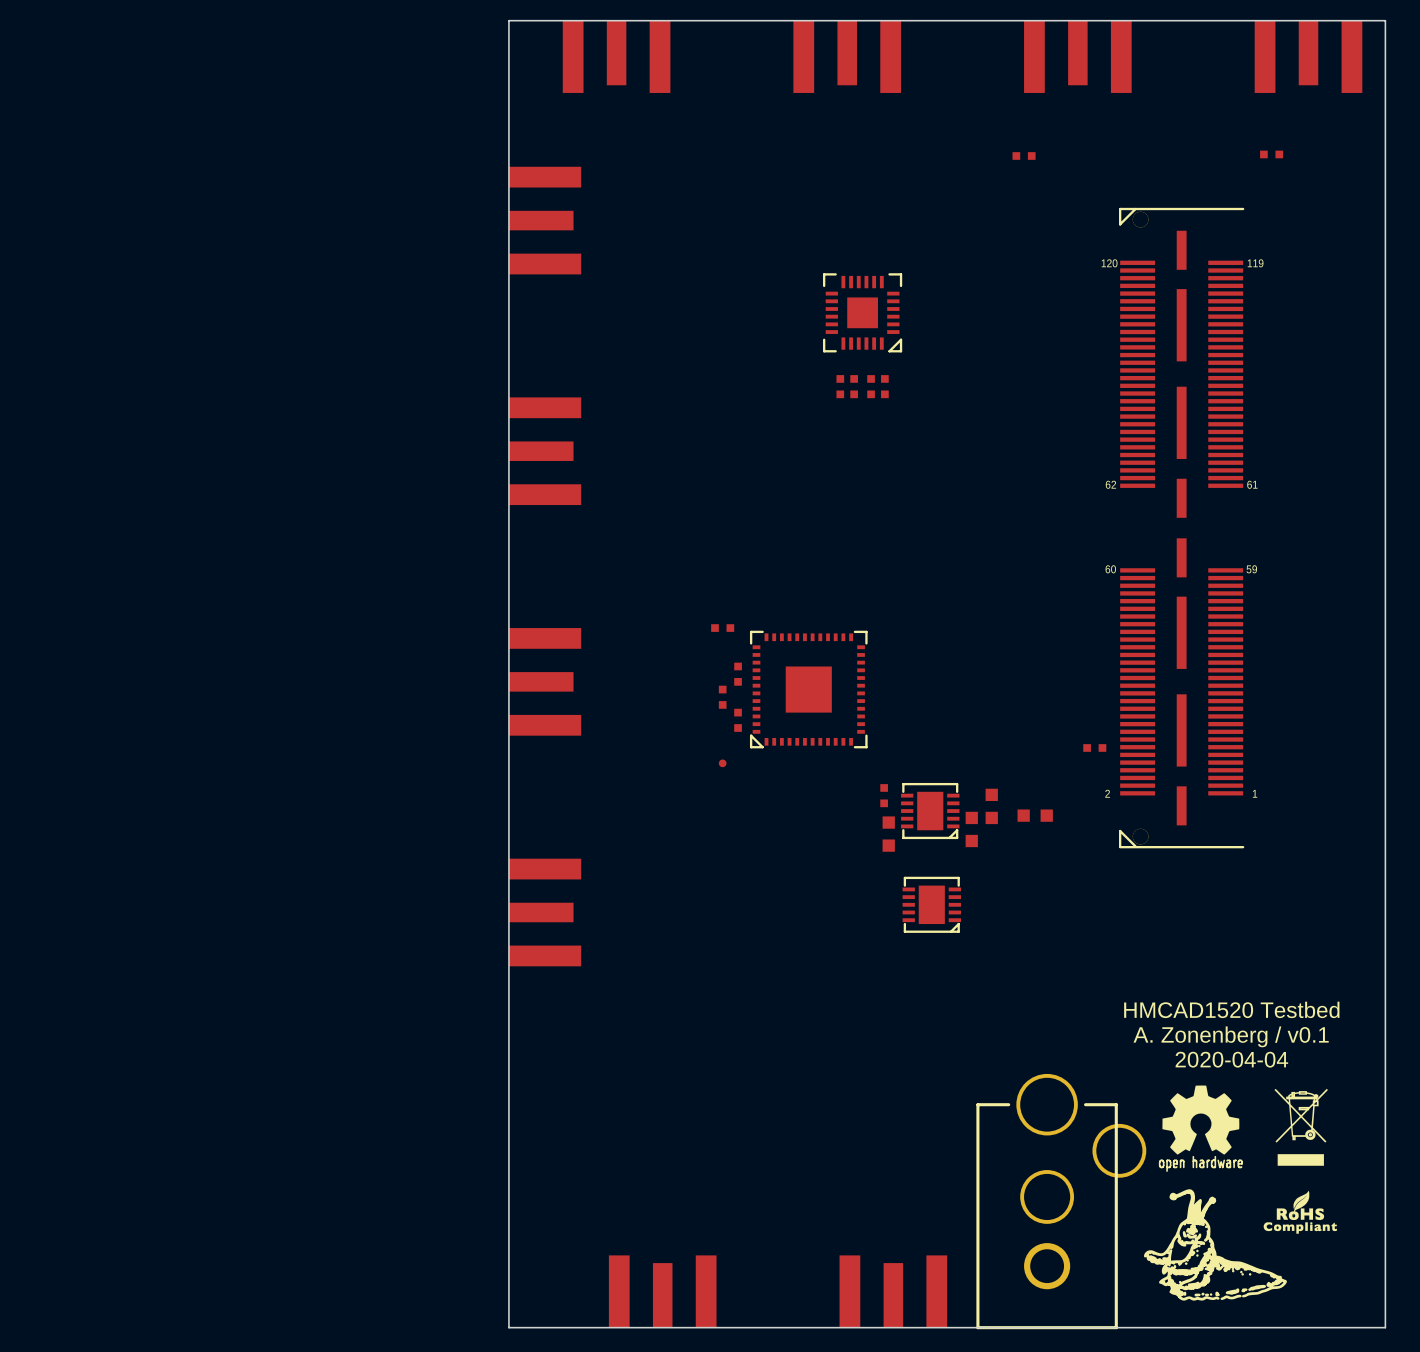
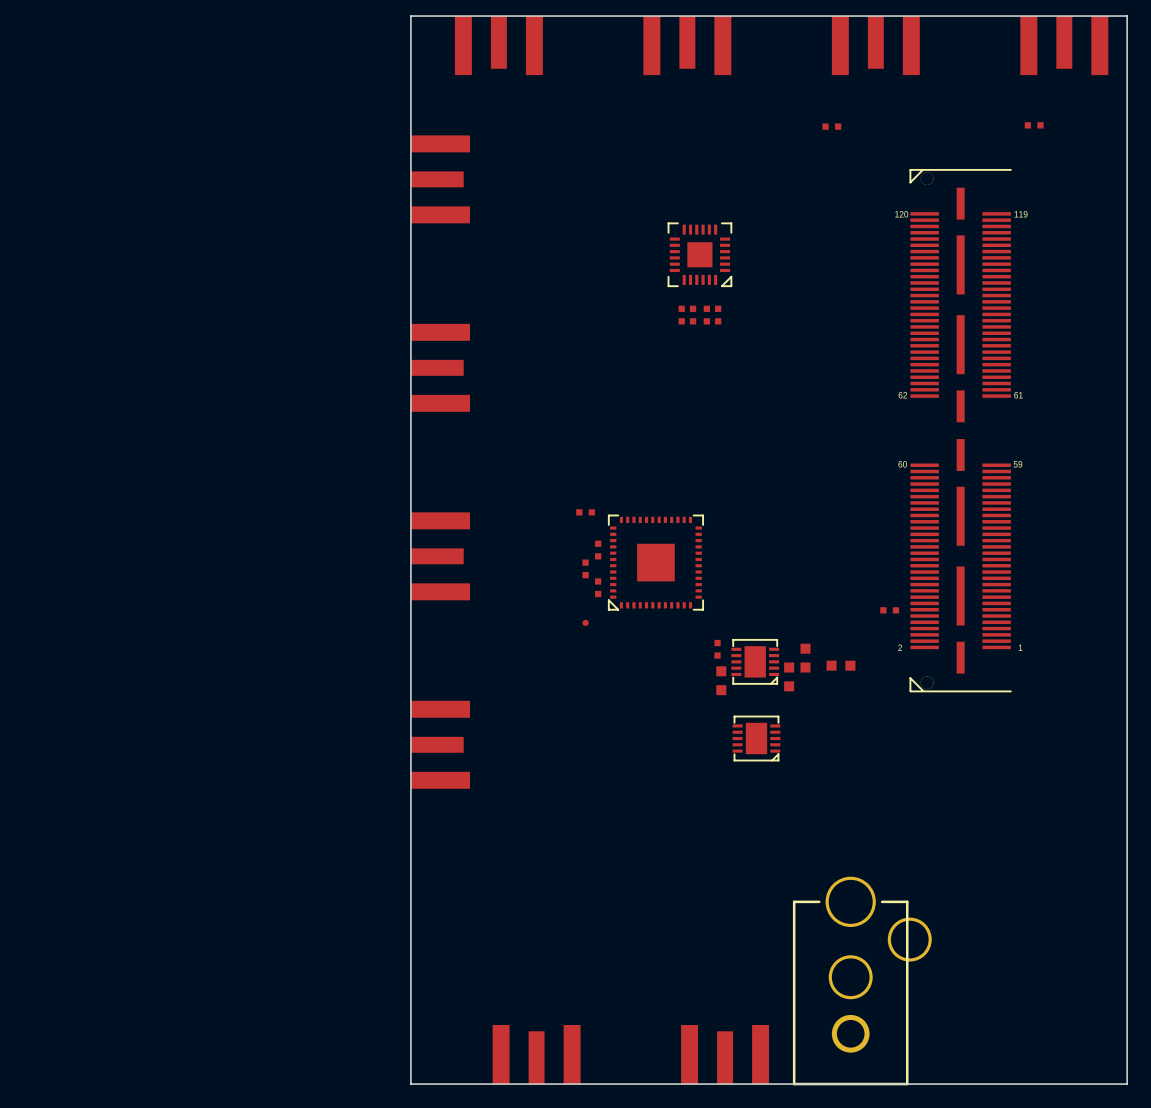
text: HMCAD1520 Testbed (1231, 1009) -> none
text: A. Zonenberg / v0.1 (1231, 1036) -> none
text: 2020-04-04 (1231, 1059) -> none
drawing: [1144, 1085, 1337, 1301] -> none
drawing: [1274, 1088, 1328, 1166] -> none

